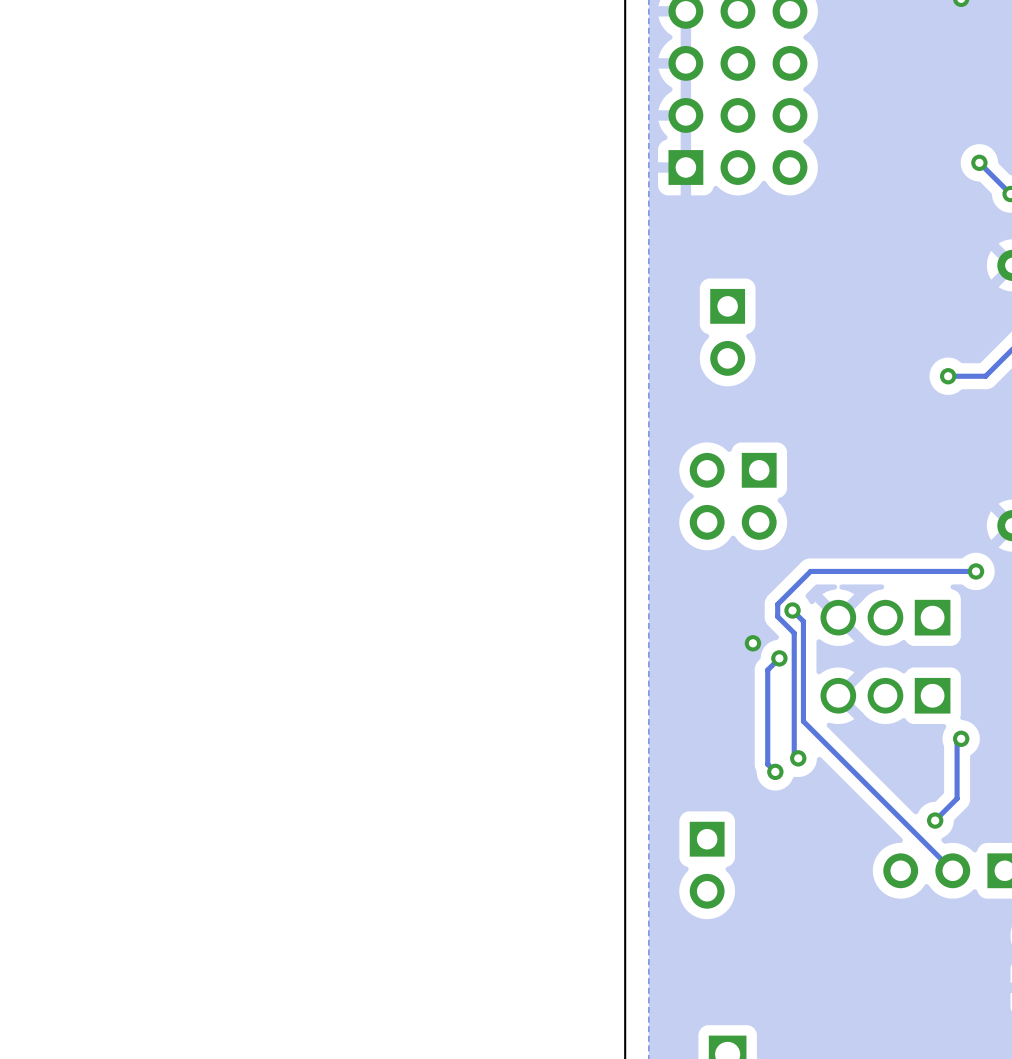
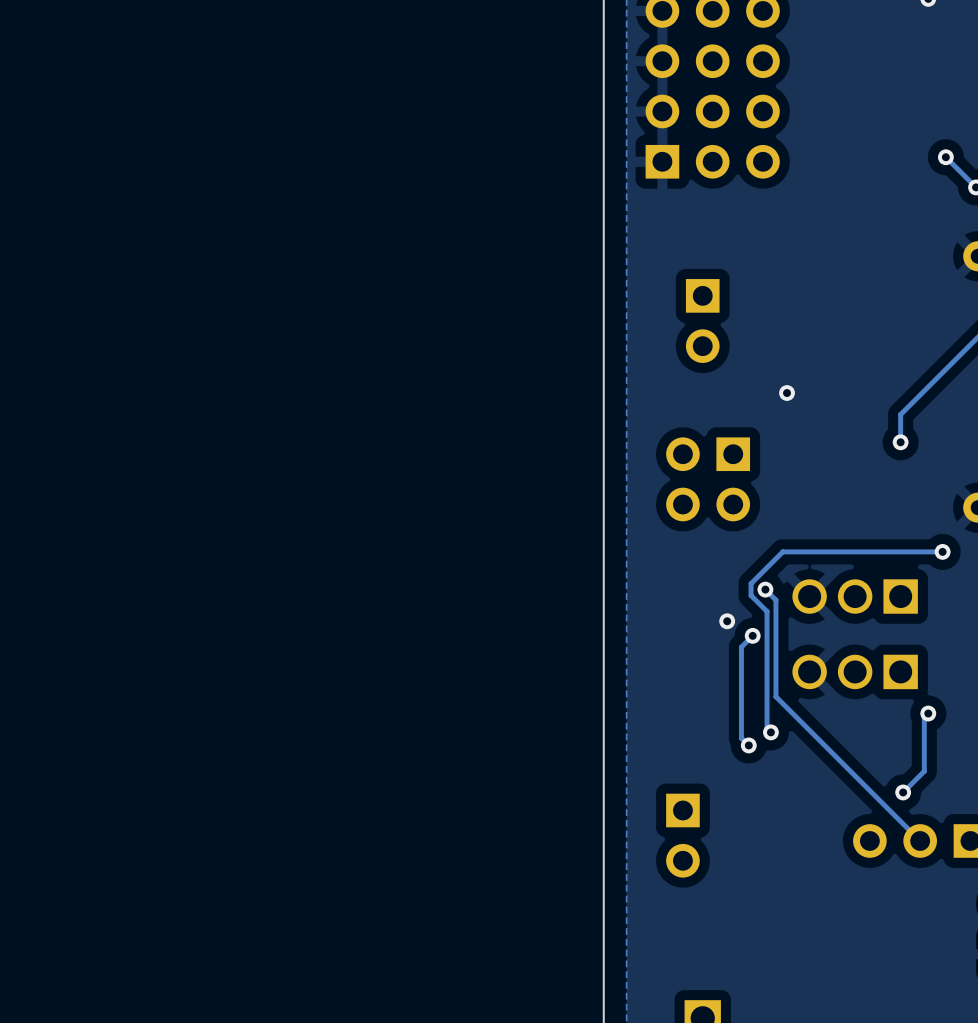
via: (948, 376) -> none
track: (985, 376) (948, 376) -> (951, 363) (900, 414) (900, 442)
via: none -> (787, 393)
via: none -> (900, 442)

